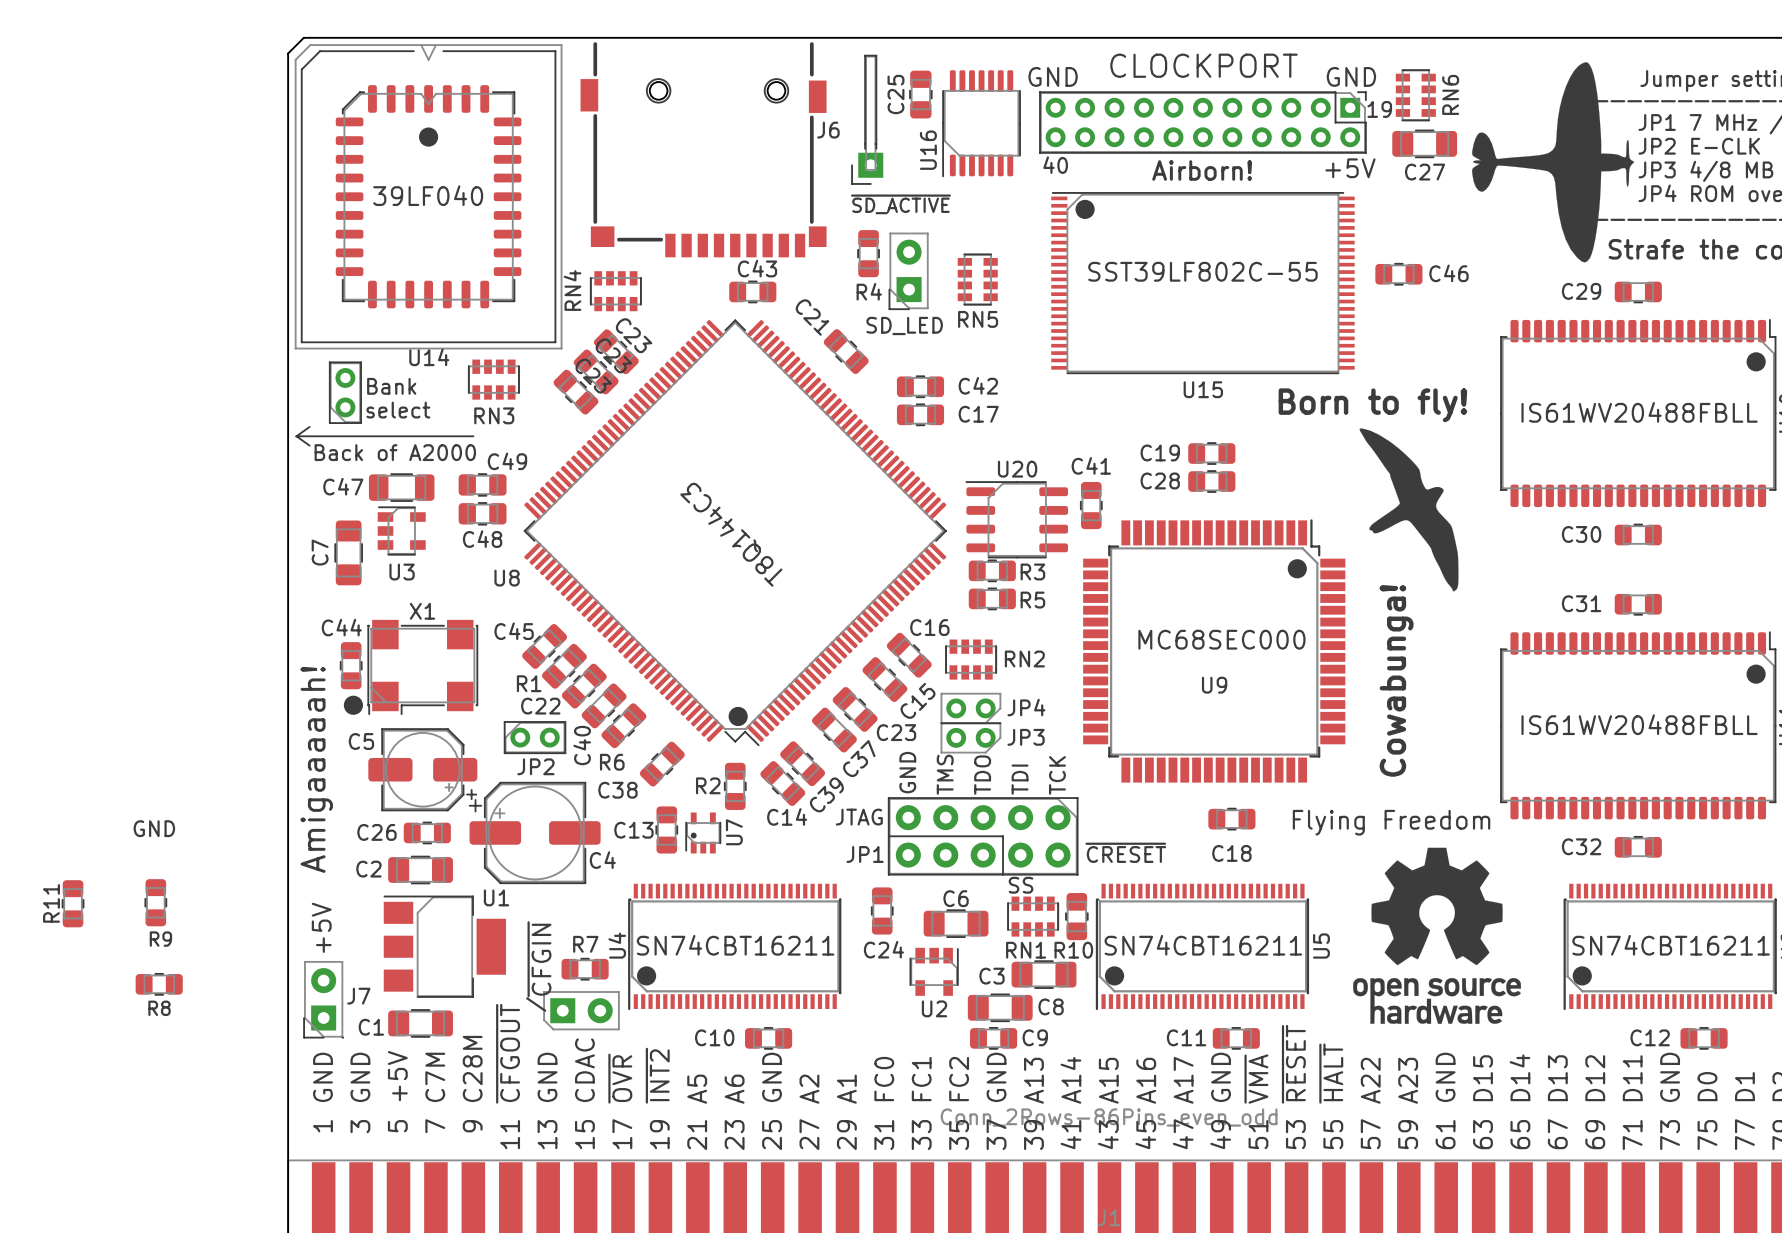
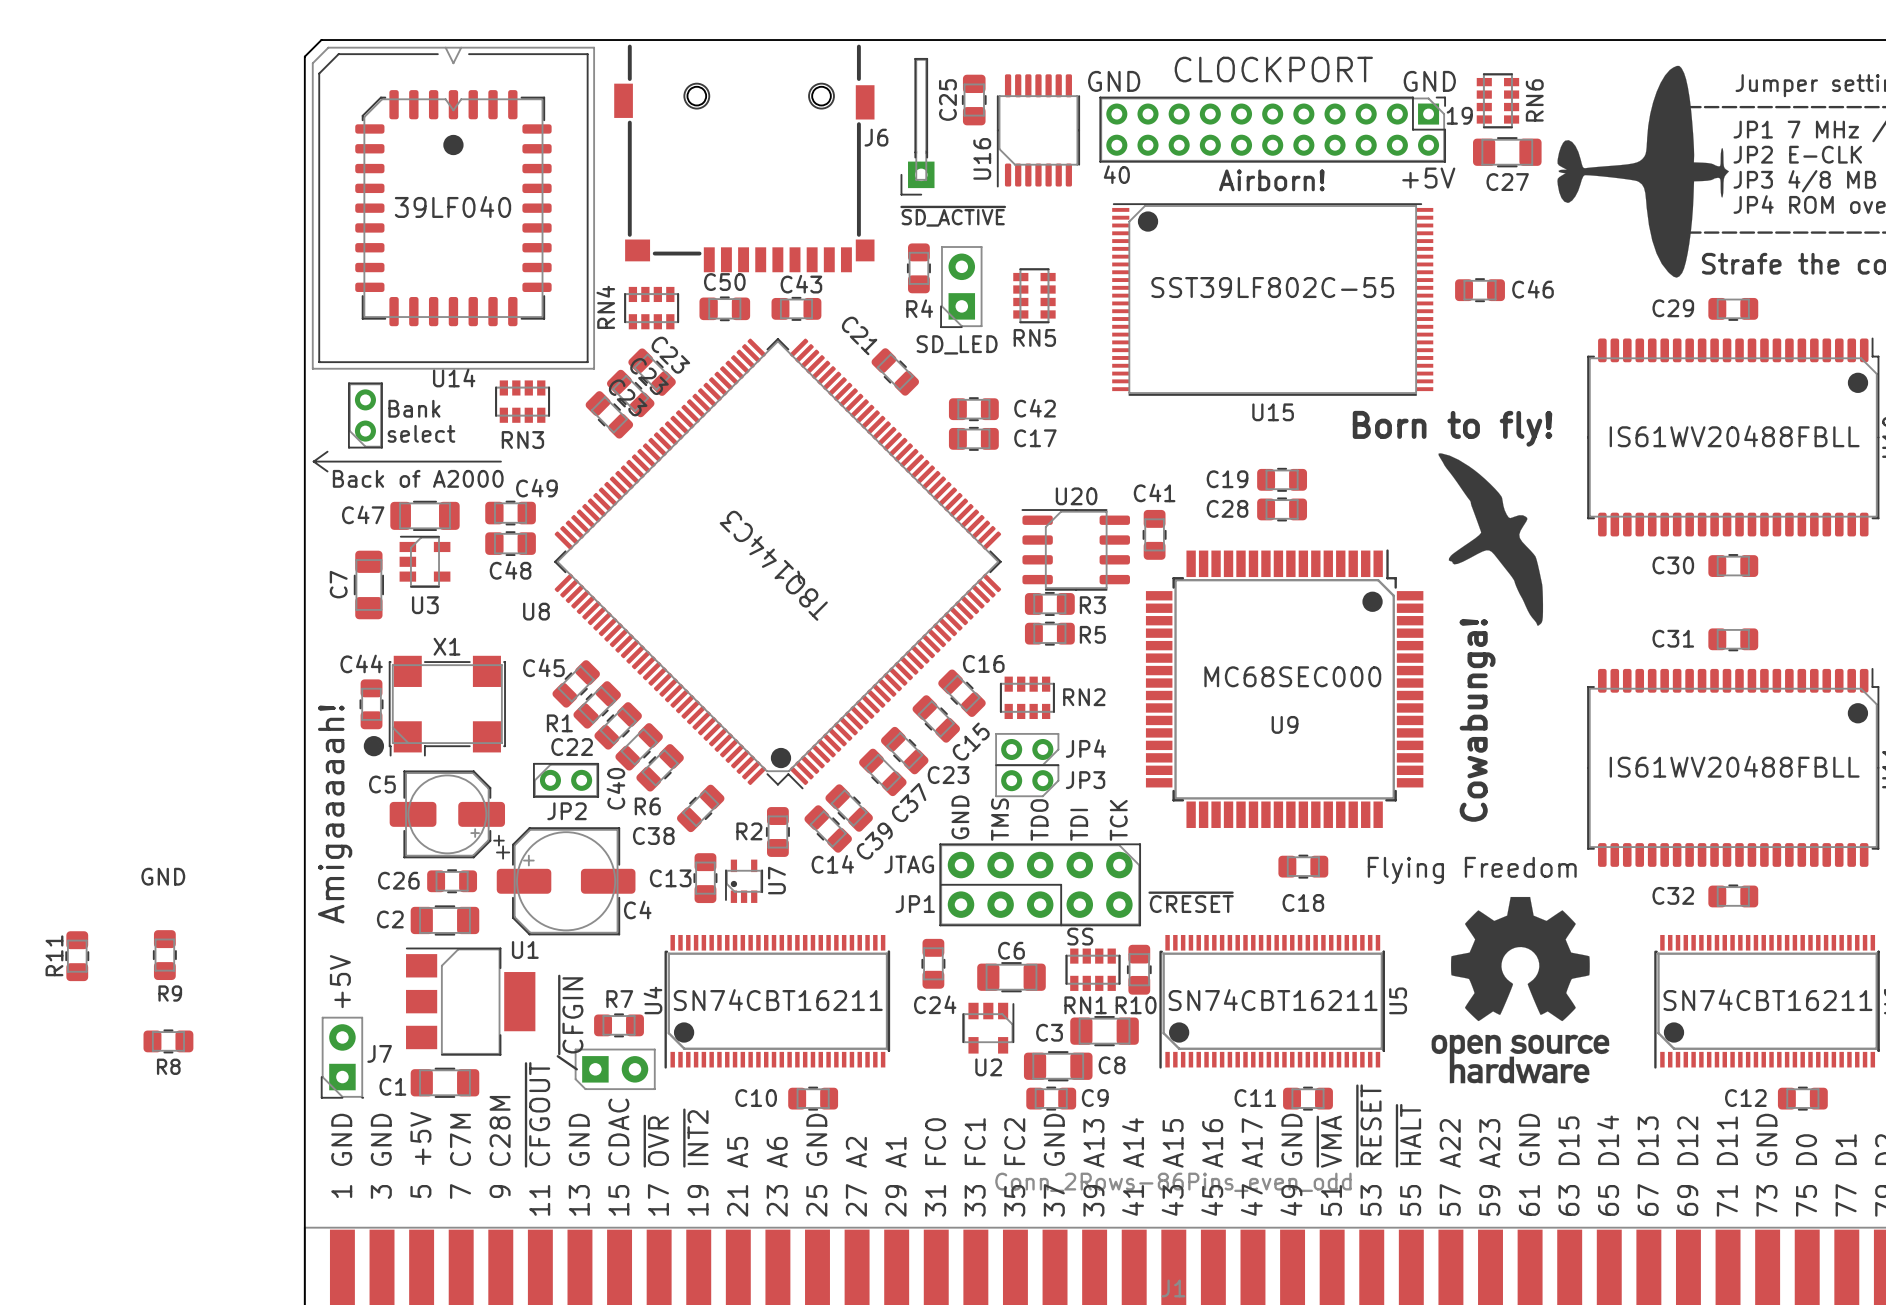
C50: none -> (724, 308)

